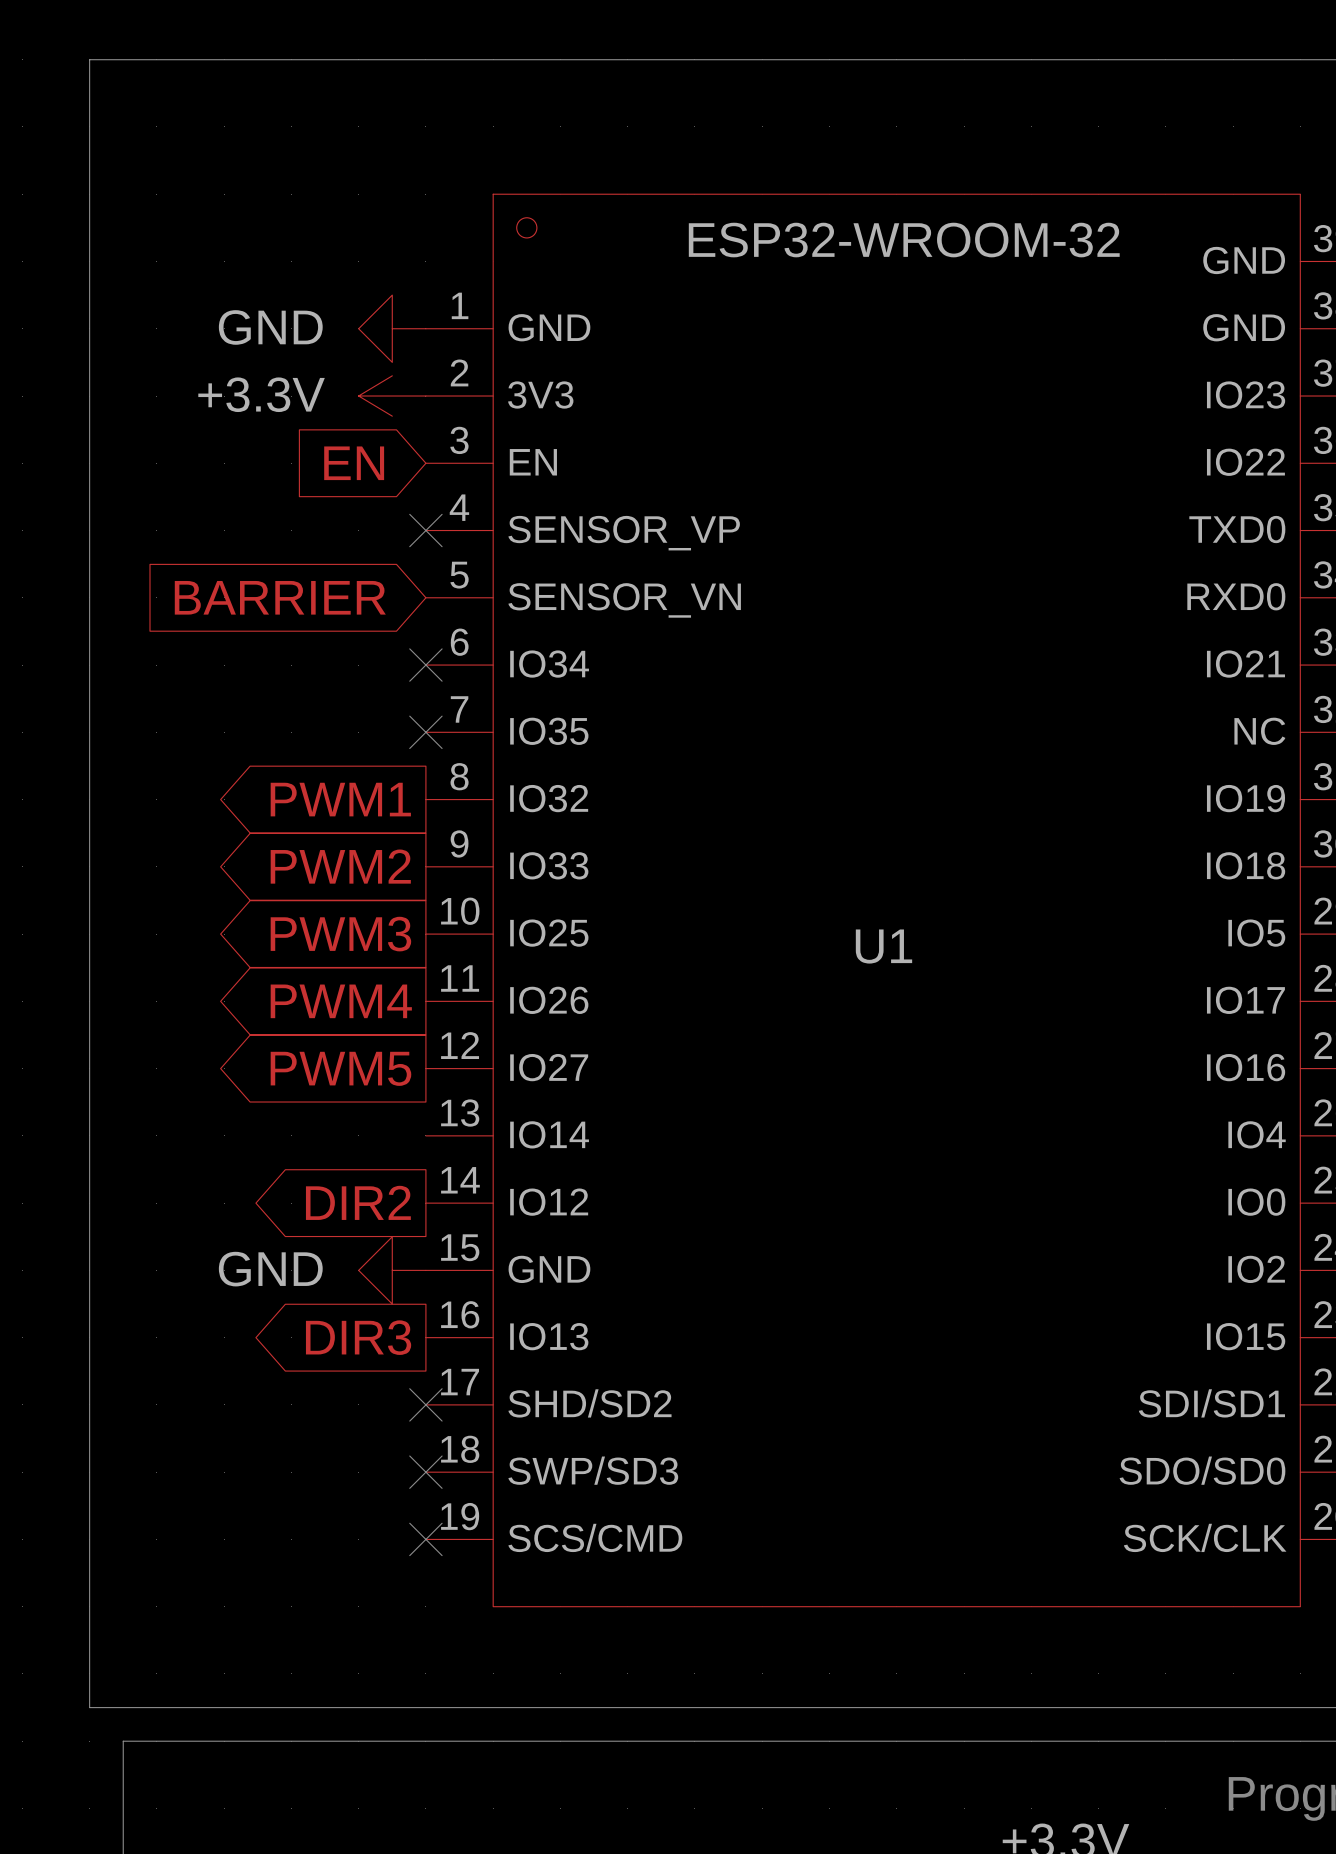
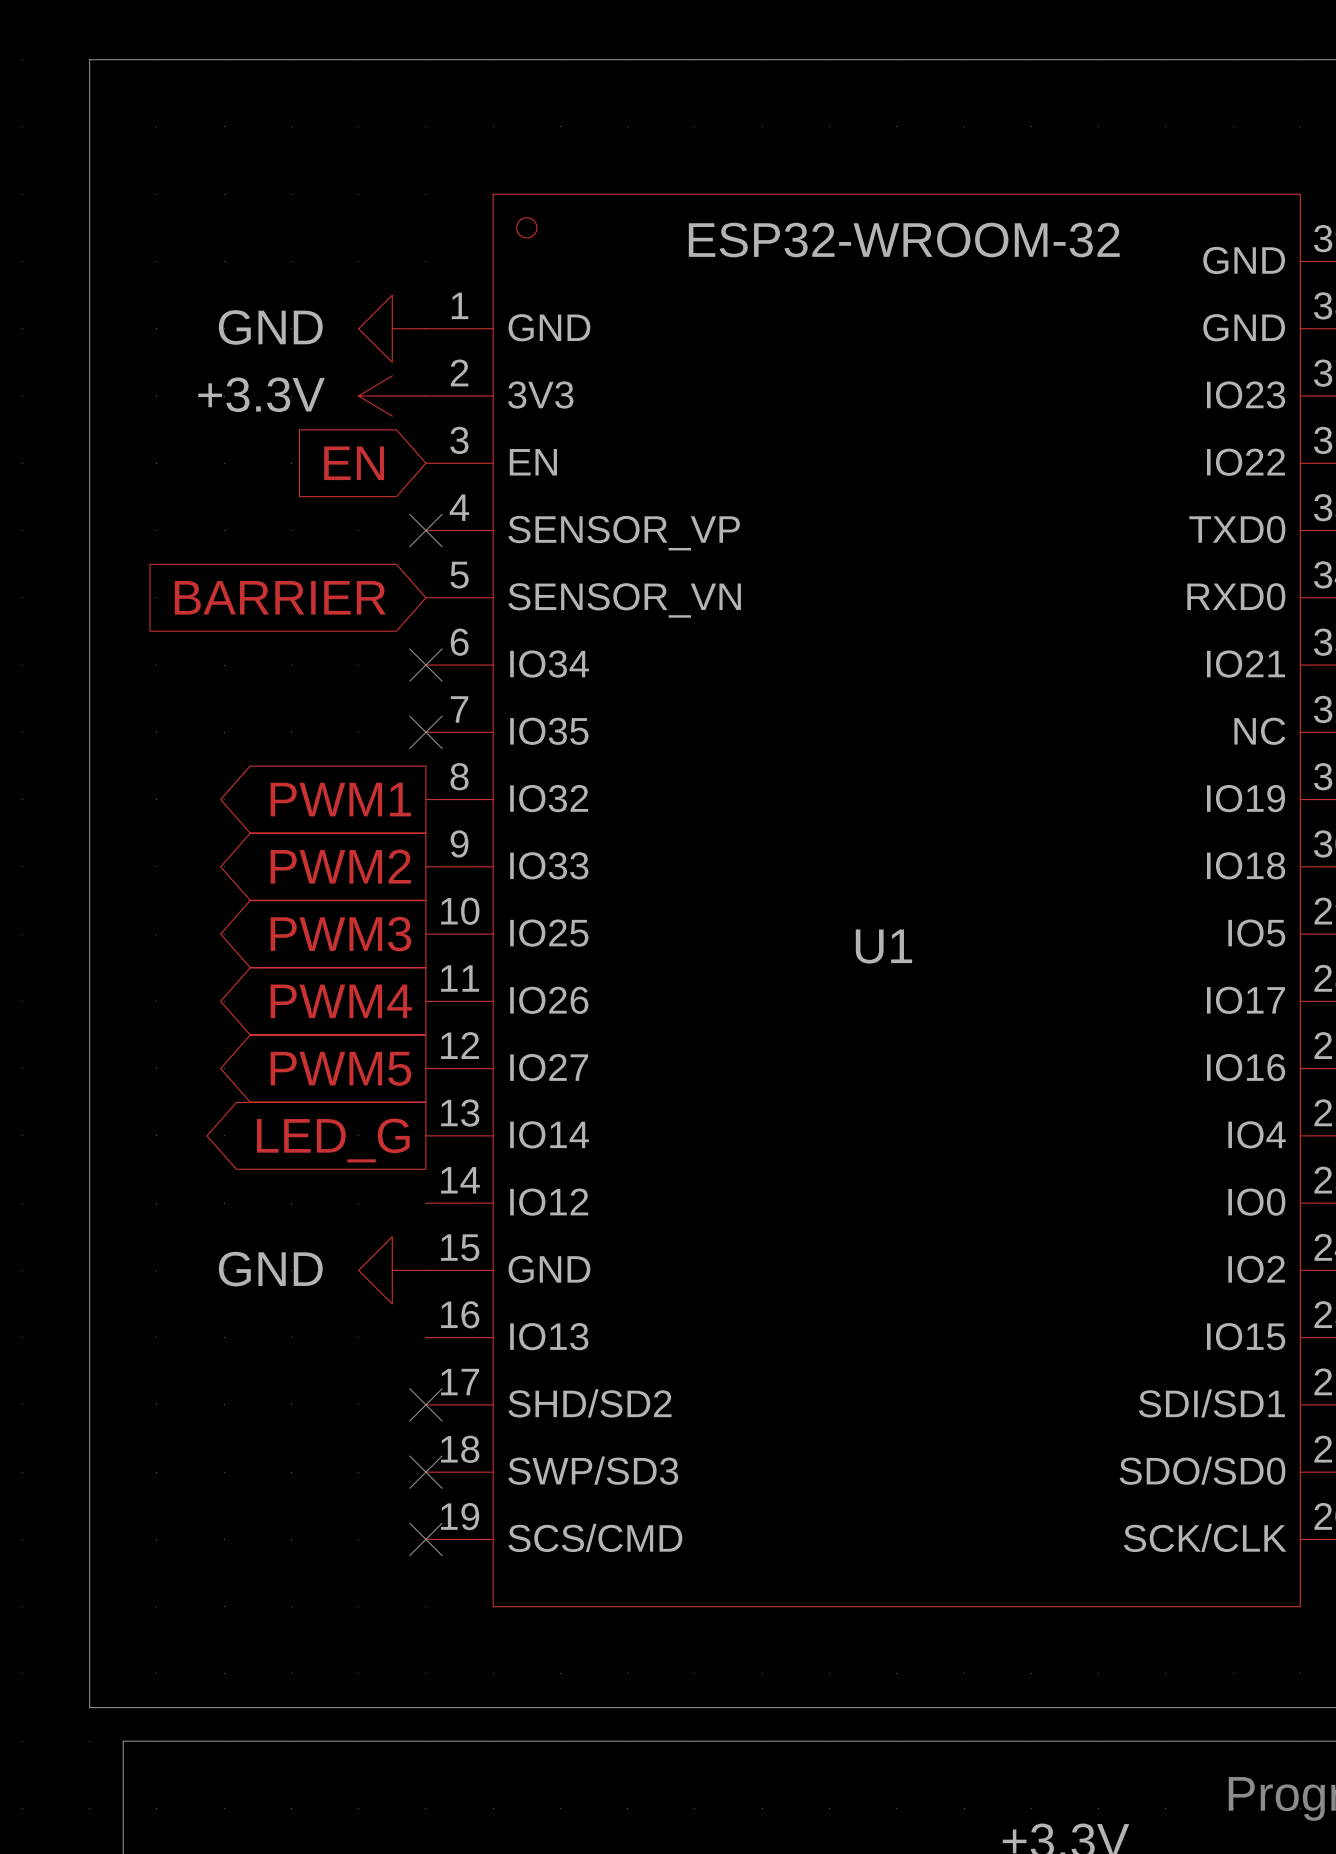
global label: none -> LED_G (333, 1140)
global label: DIR2 (358, 1202) -> none
global label: DIR3 (358, 1337) -> none

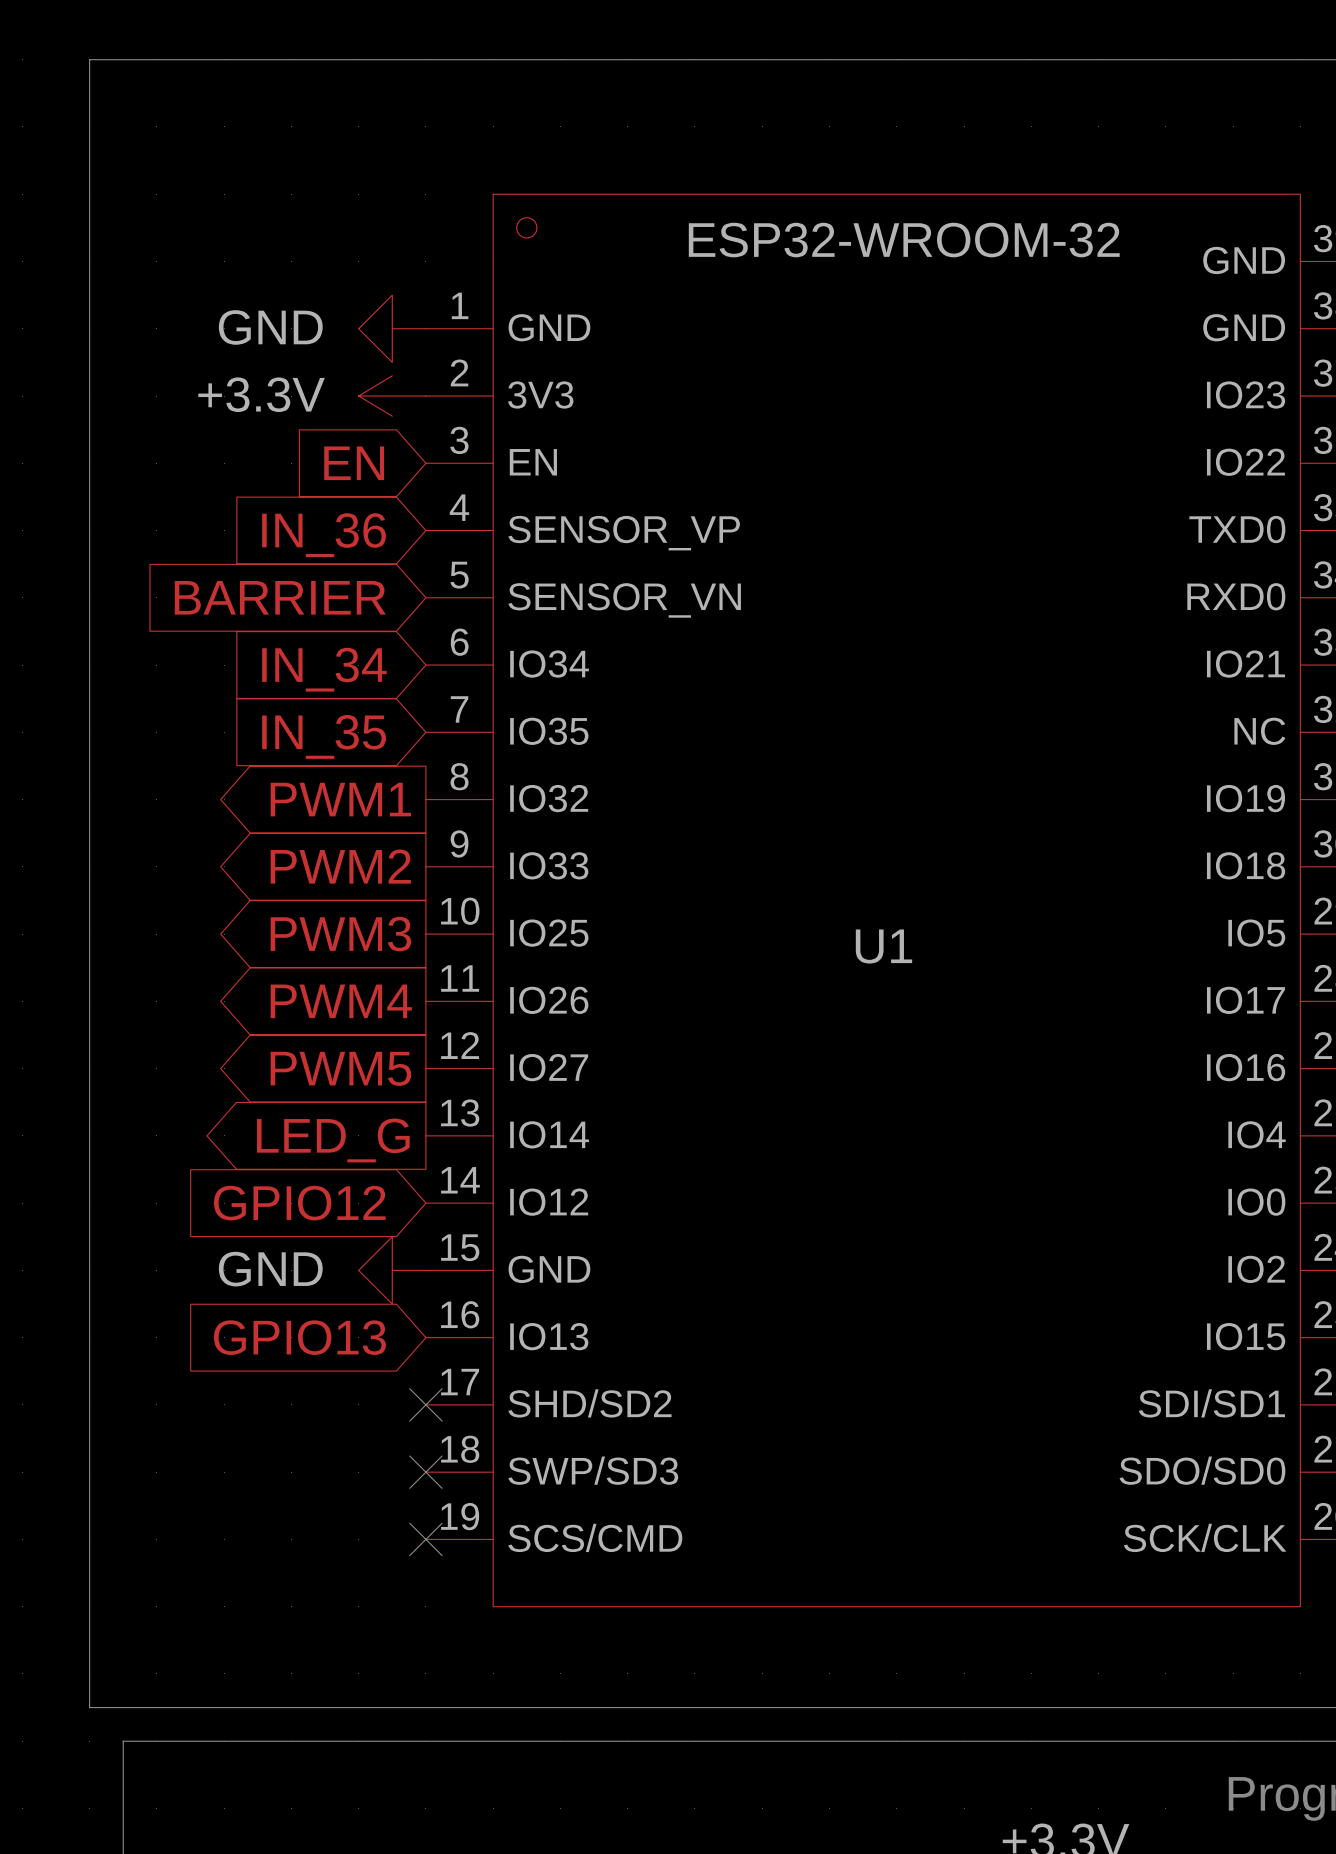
no-connect mark: (425, 530) -> none
global label: none -> IN_36 (324, 535)
no-connect mark: (425, 665) -> none
global label: none -> IN_34 (324, 669)
no-connect mark: (425, 732) -> none
global label: none -> IN_35 (324, 736)
global label: none -> GPIO12 (299, 1203)
global label: none -> GPIO13 (299, 1337)

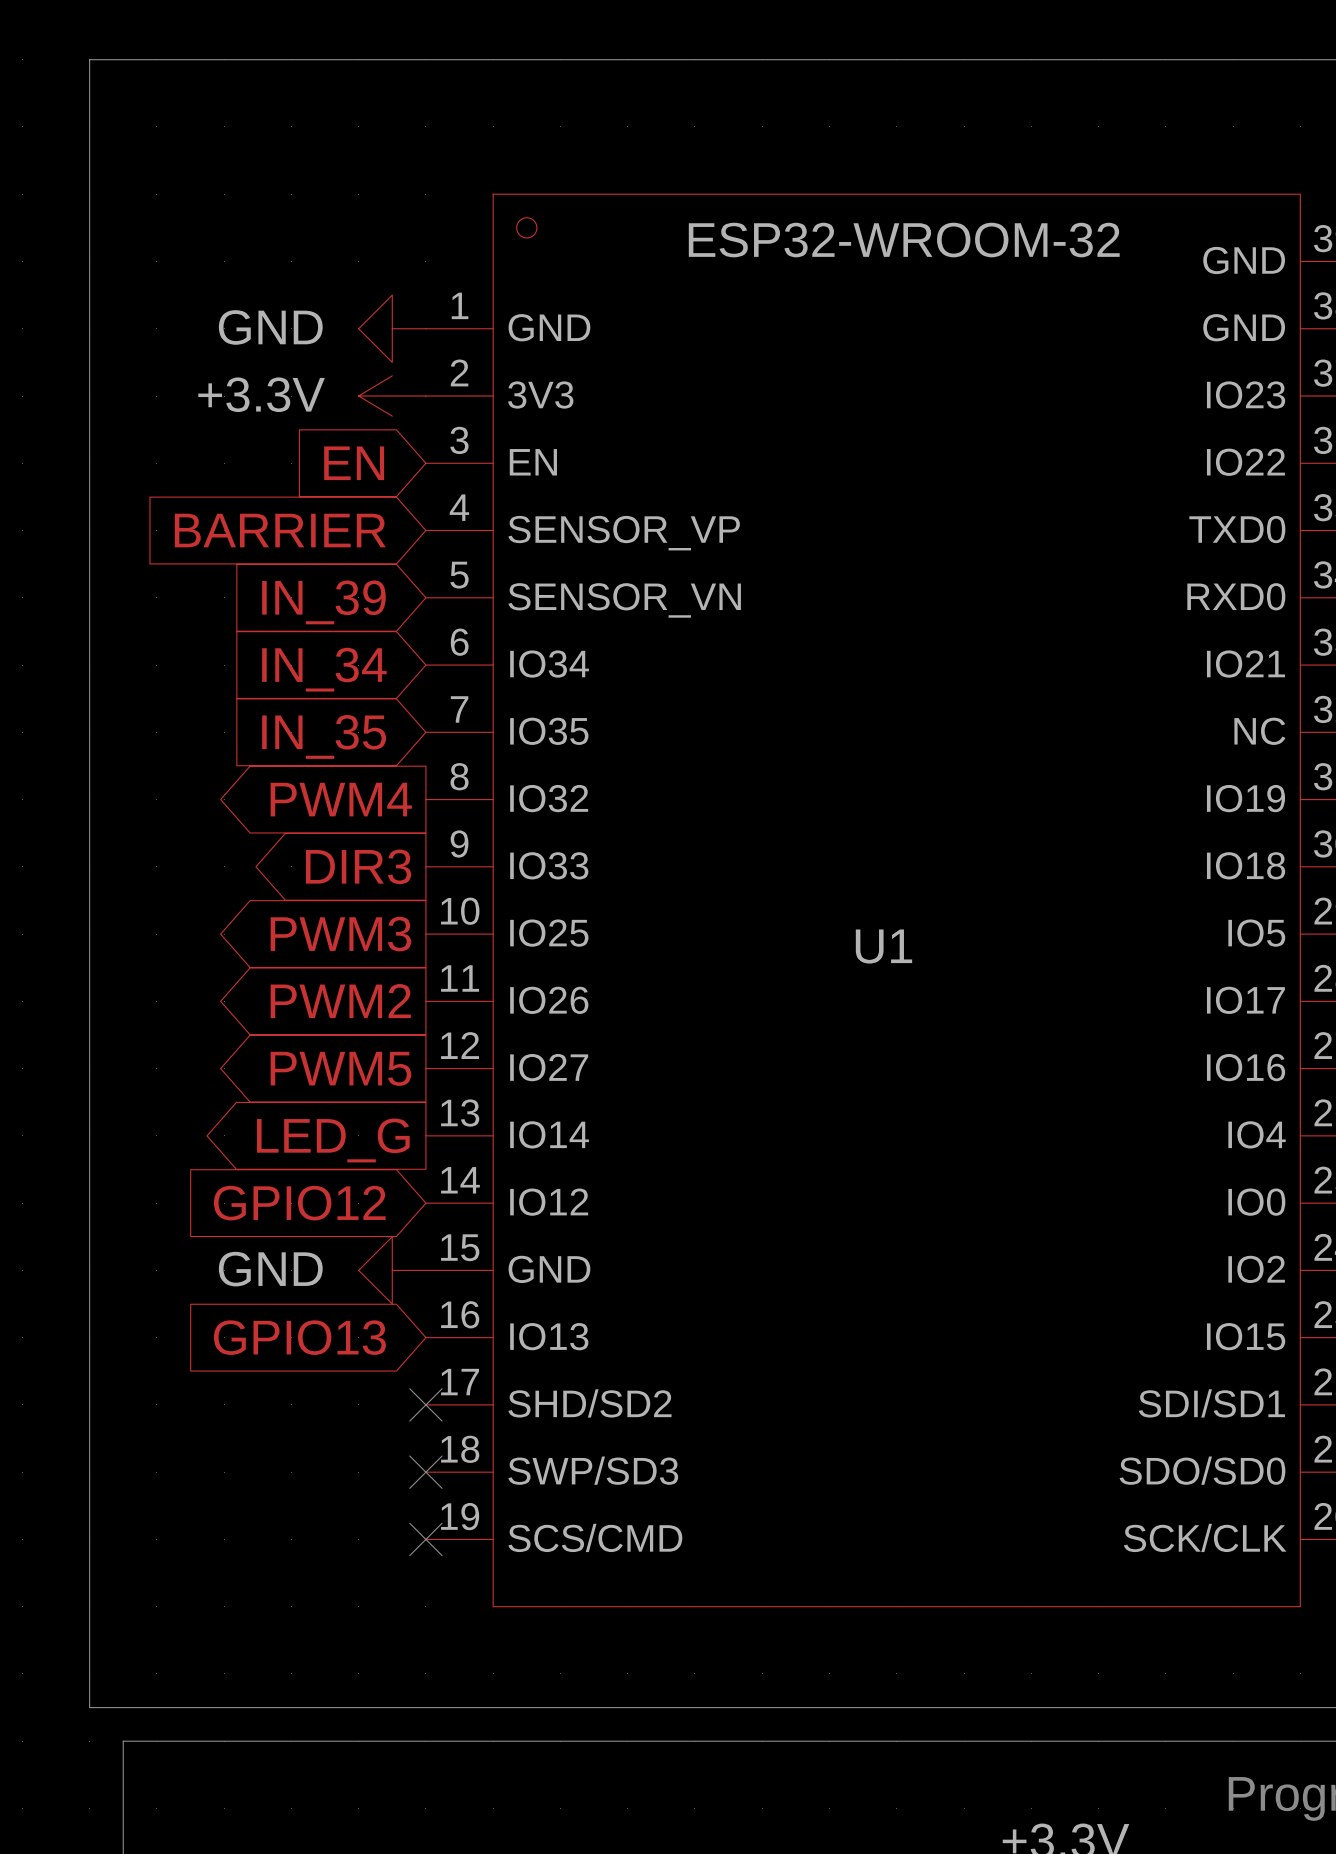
global label: IN_36 (324, 535) -> BARRIER (280, 530)
global label: BARRIER (280, 597) -> IN_39 (323, 602)
global label: PWM1 (340, 799) -> PWM4 (341, 799)
global label: PWM2 (340, 866) -> DIR3 (358, 866)
global label: PWM4 (341, 1001) -> PWM2 (340, 1001)

